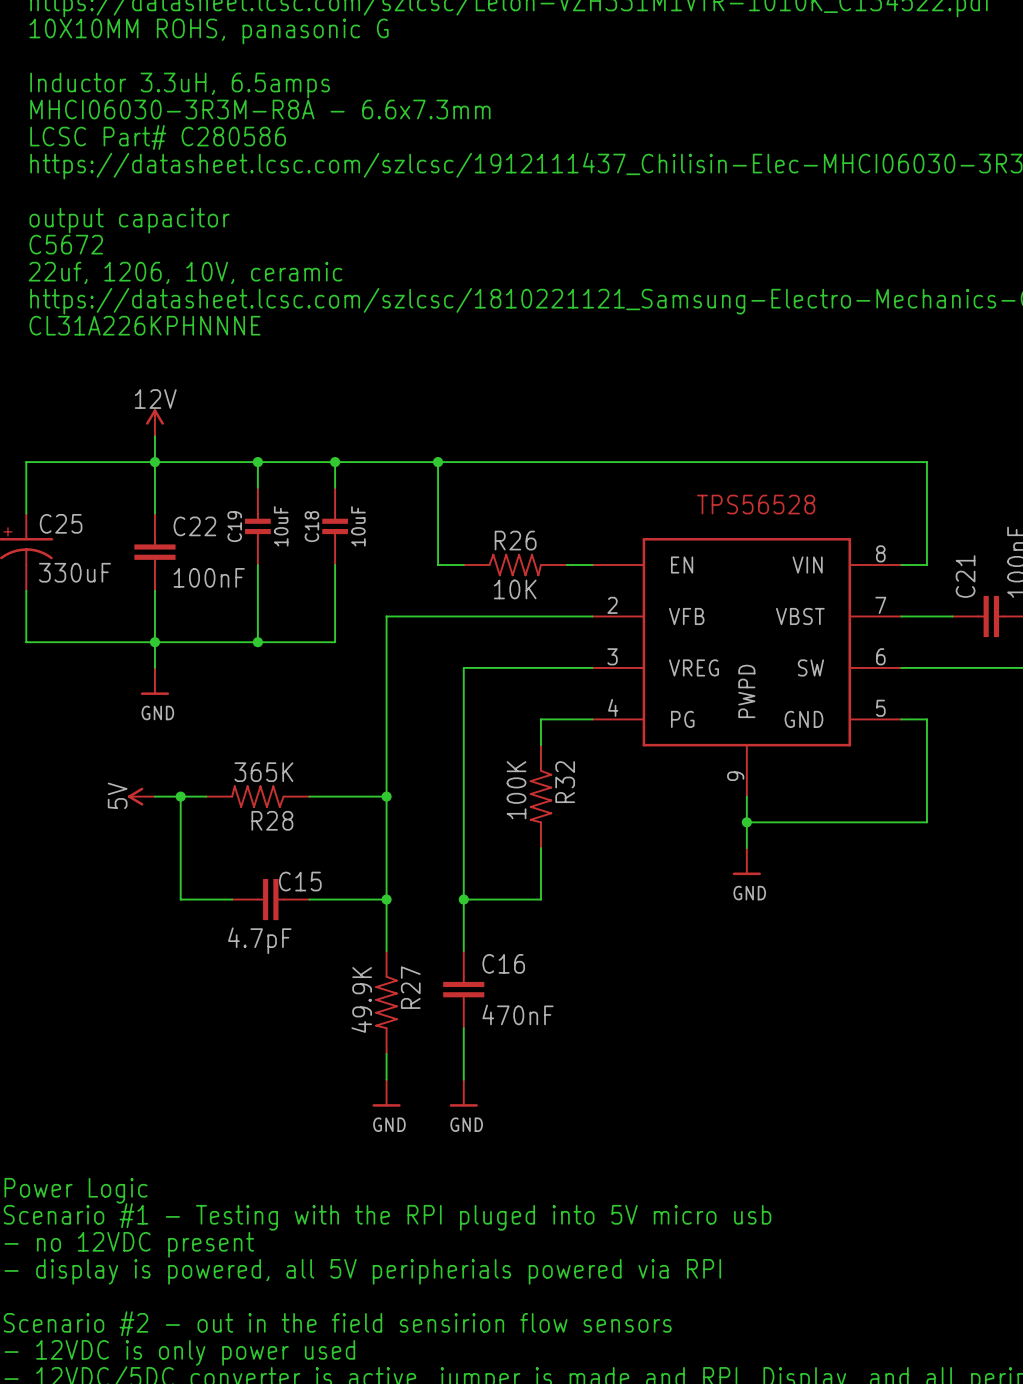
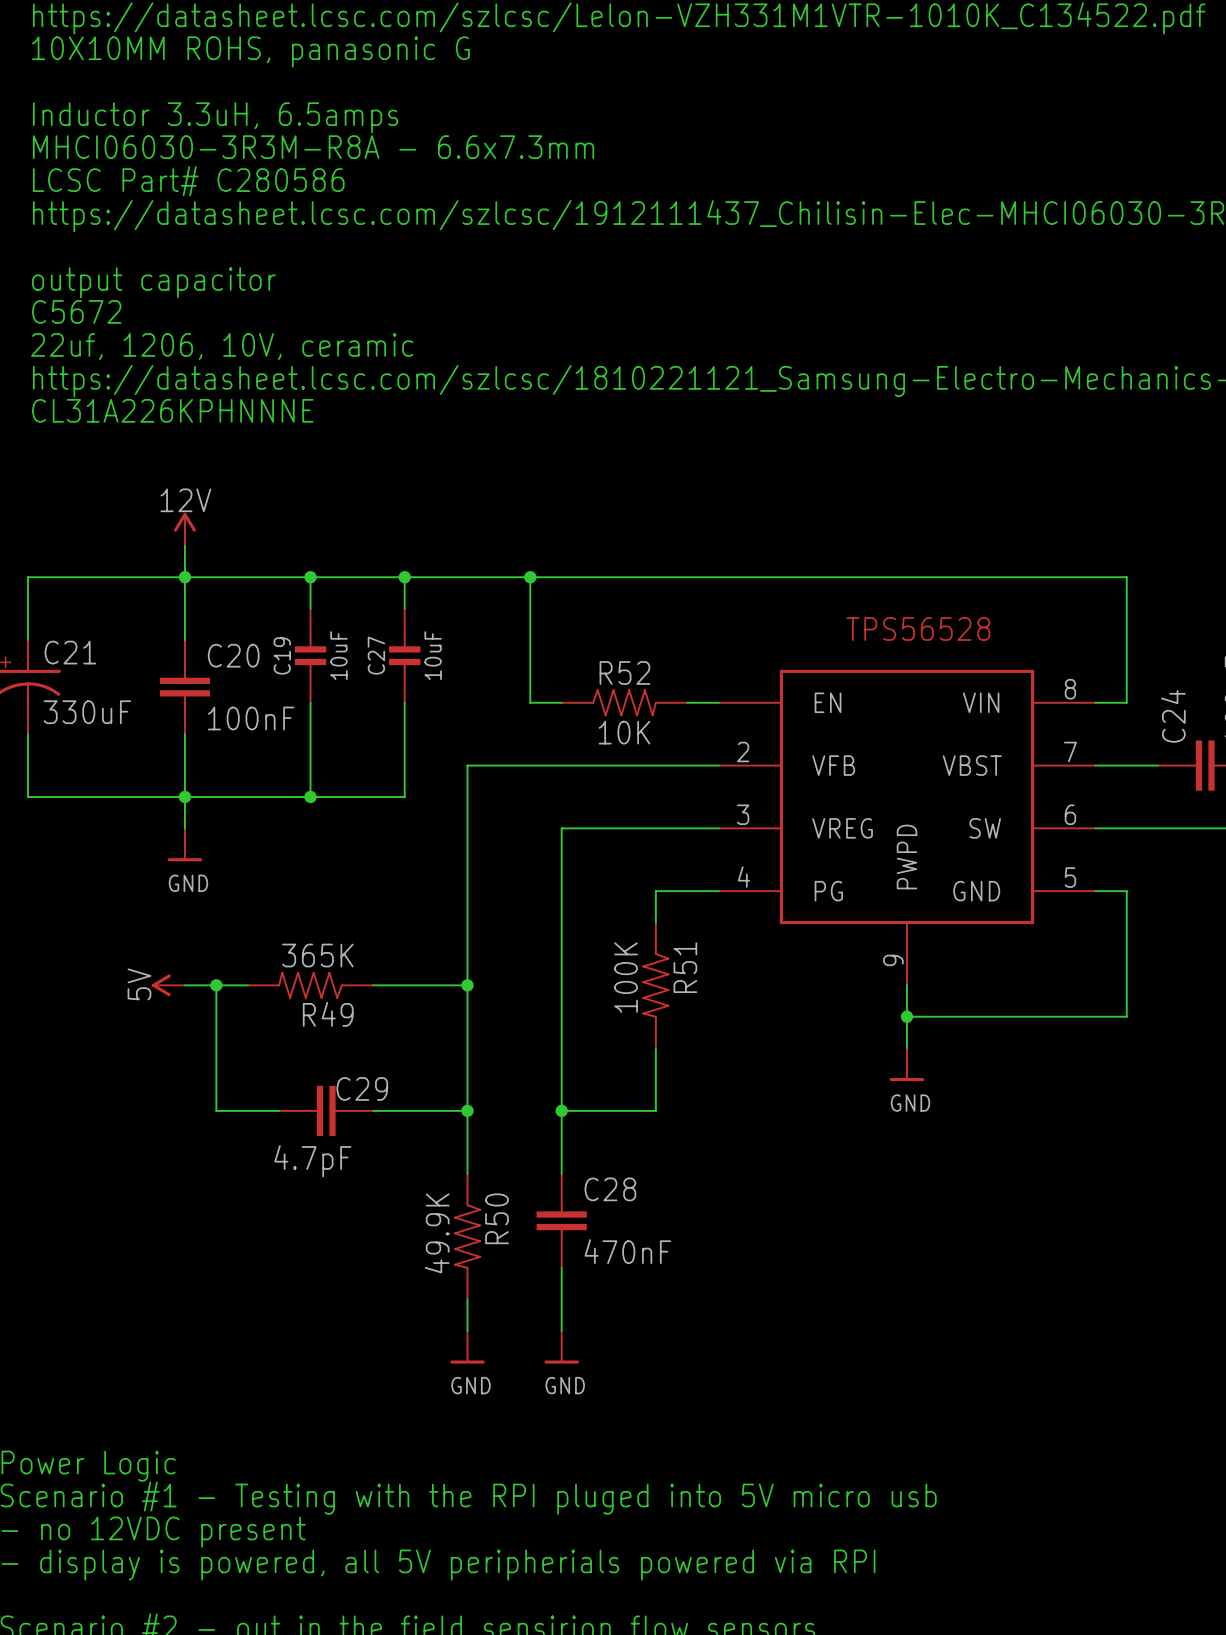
C25 name: C25 (61, 523) -> C21 (70, 652)
C22 name: C22 (194, 526) -> C20 (233, 655)
C18 name: C18 (311, 526) -> C27 (376, 655)
R26 name: R26 (515, 540) -> R52 (624, 672)
C21 name: C21 (965, 576) -> C24 (1173, 716)
R32 name: R32 (565, 782) -> R51 (685, 967)
R28 name: R28 (272, 820) -> R49 (328, 1014)
C15 name: C15 (300, 881) -> C29 (362, 1088)
C16 name: C16 (503, 963) -> C28 (610, 1189)
R27 name: R27 (410, 987) -> R50 (497, 1218)

